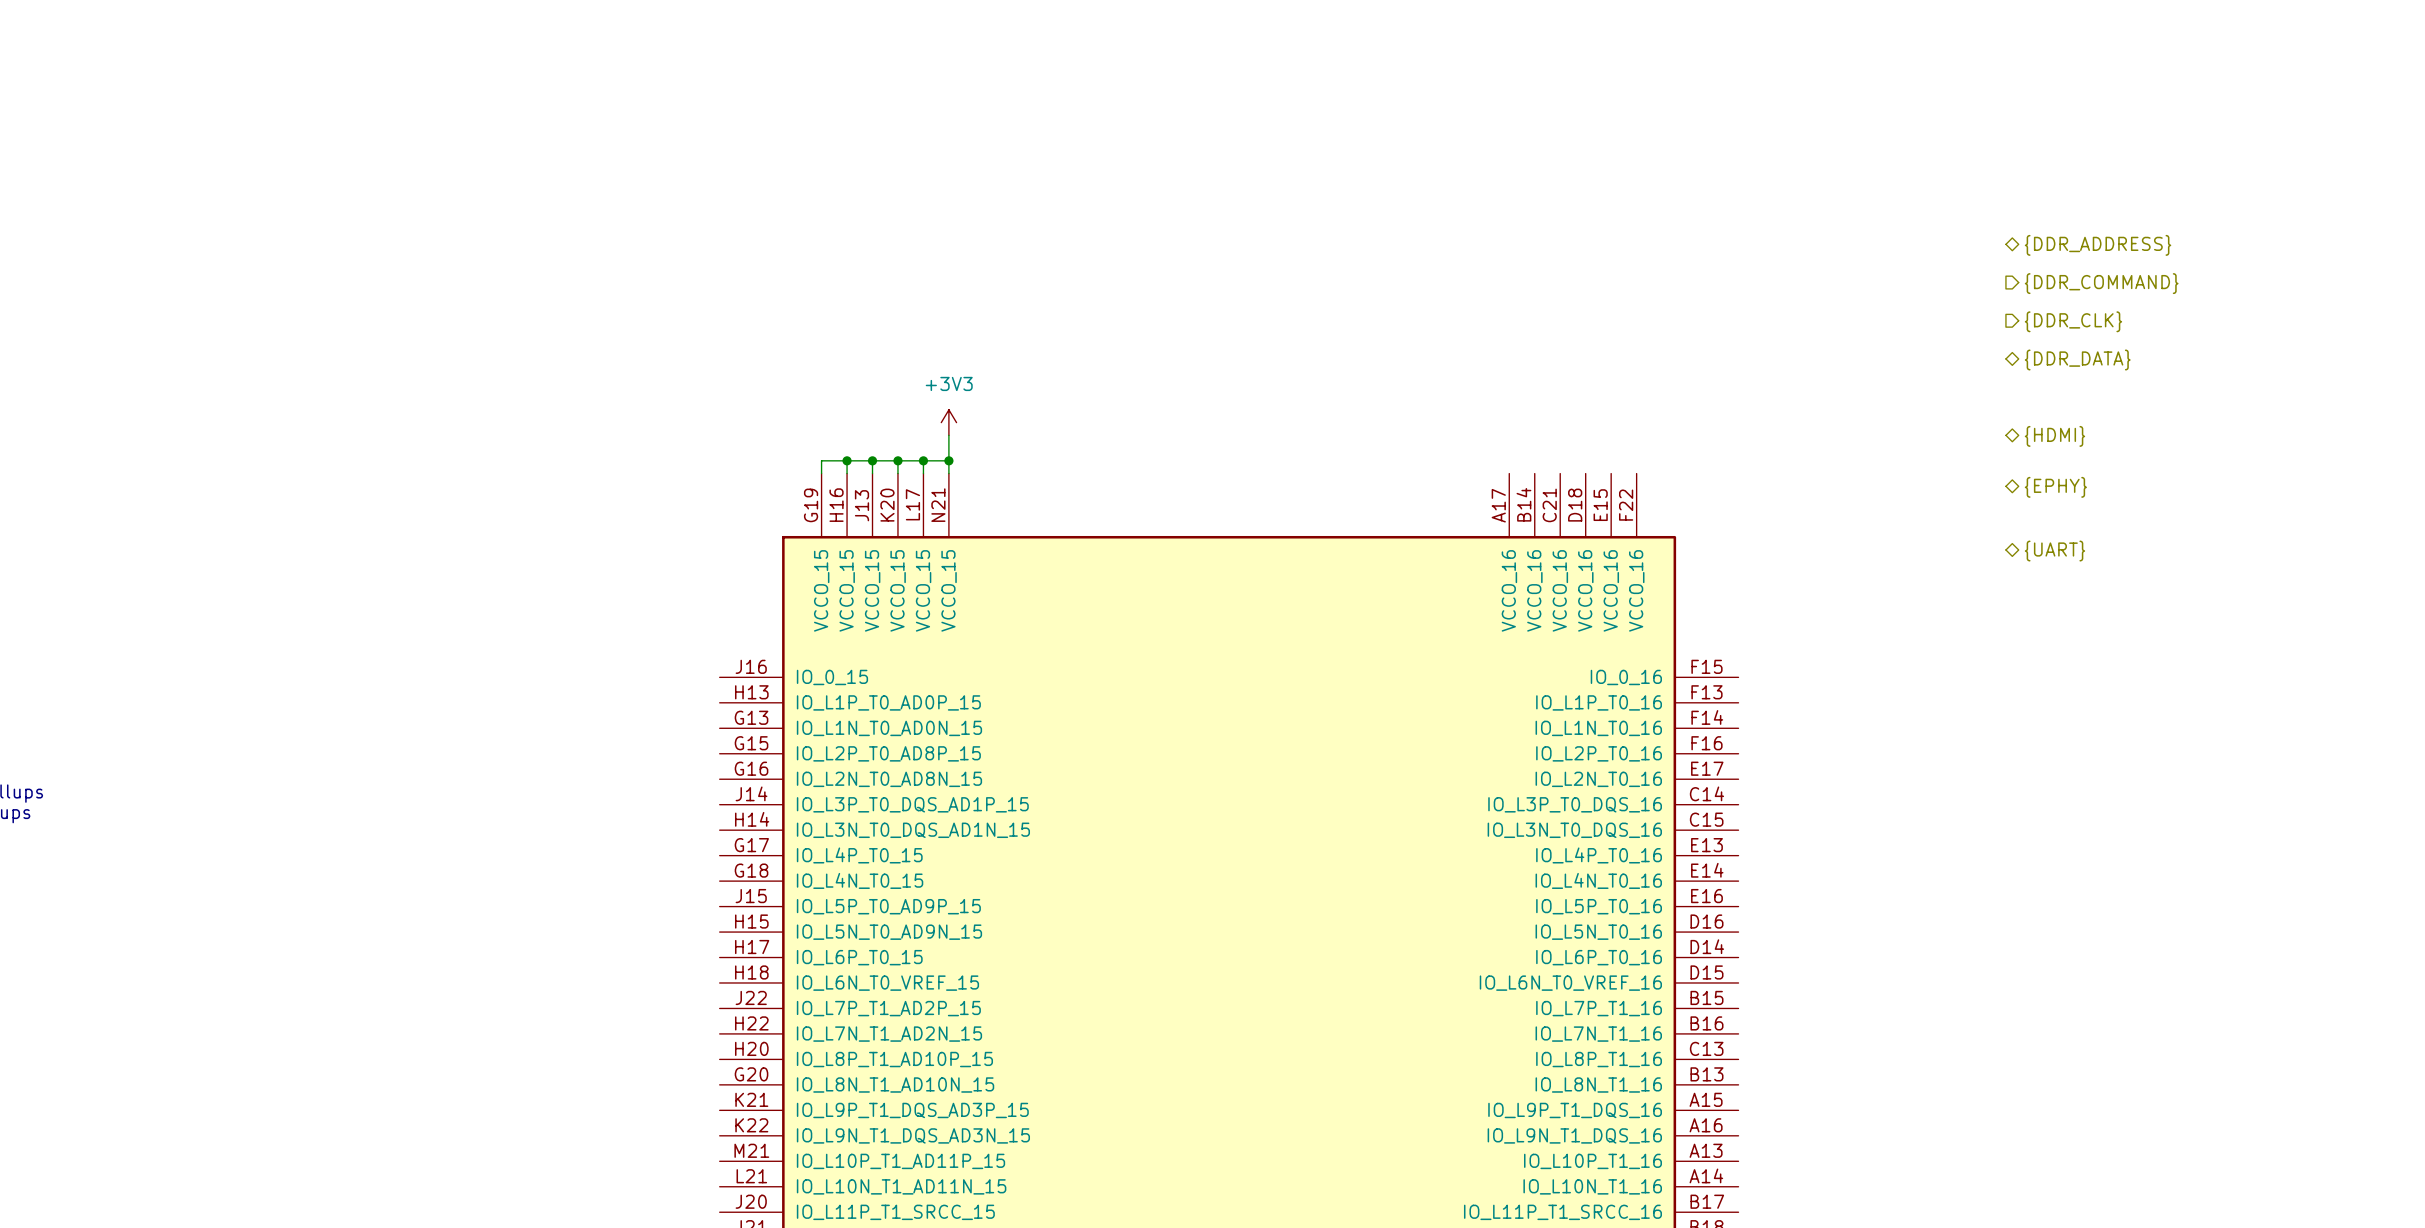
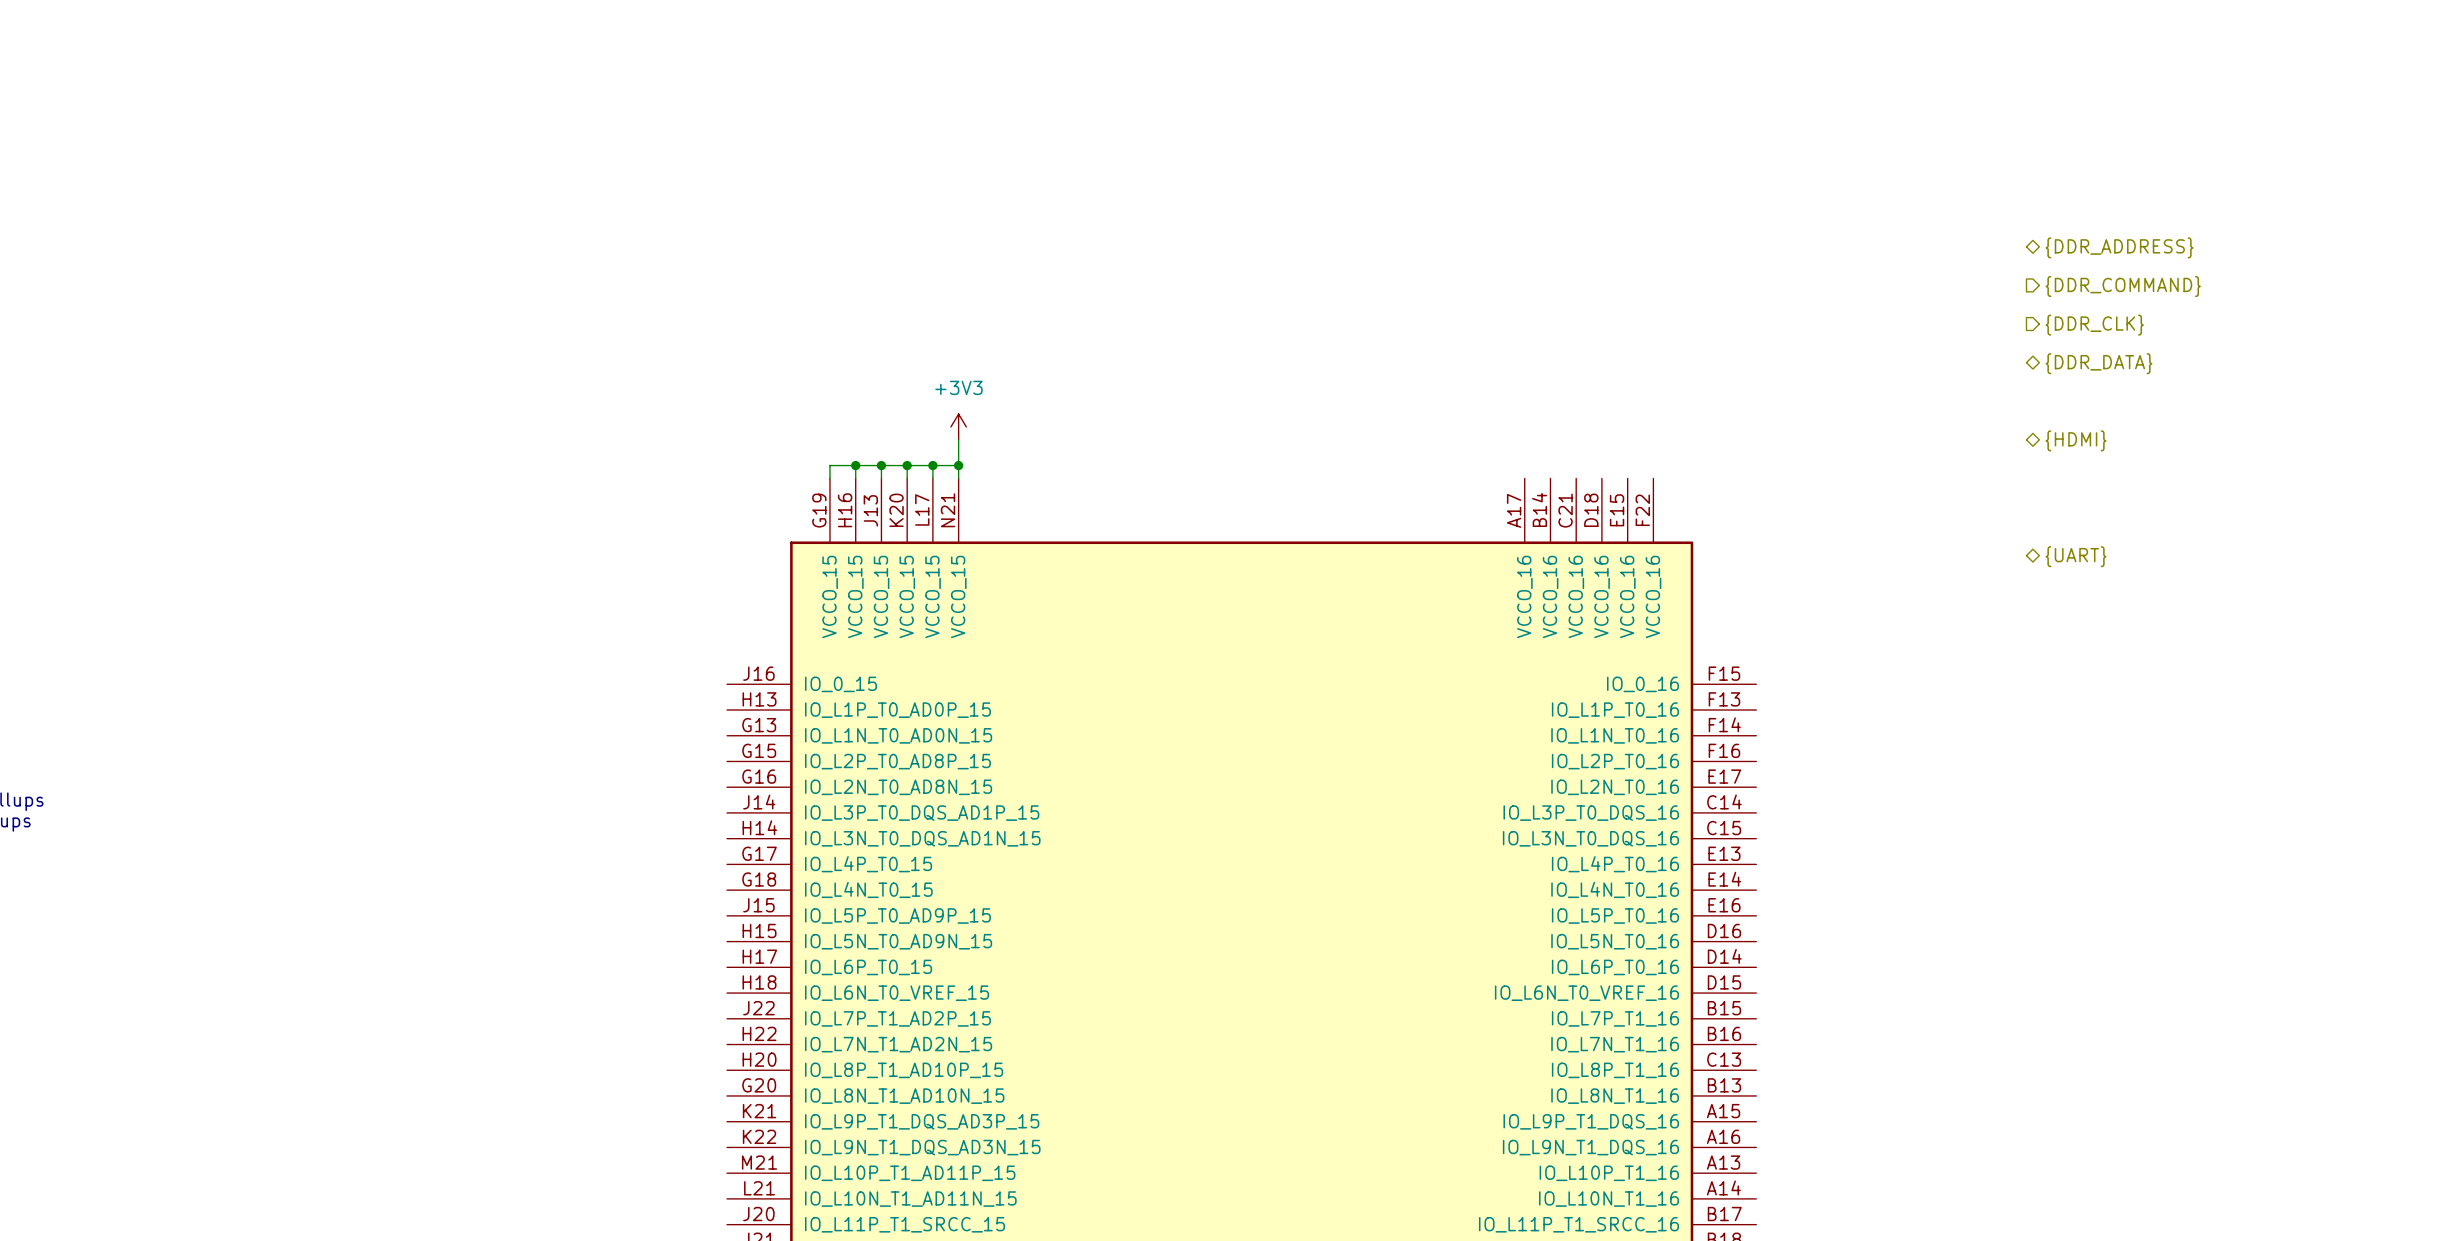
hierarchical label: {EPHY} (2055, 487) -> none

